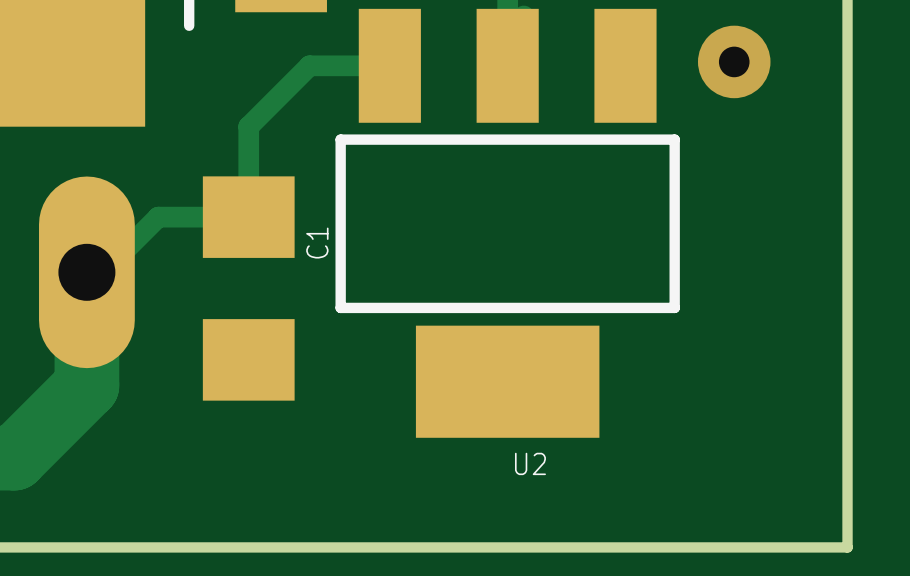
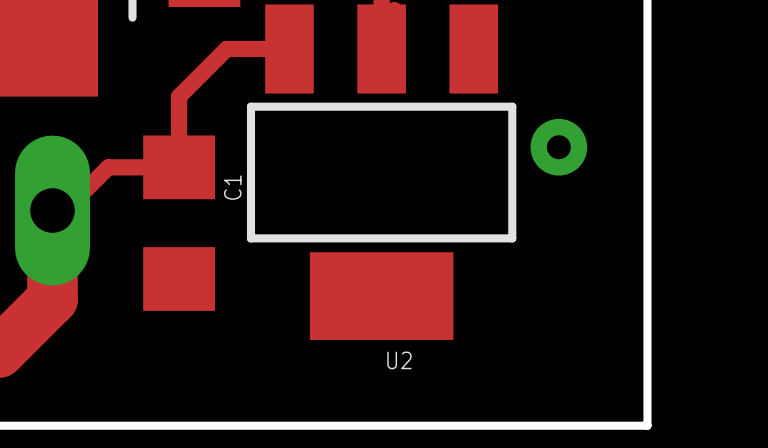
via: (734, 61) -> none
via: none -> (558, 147)

